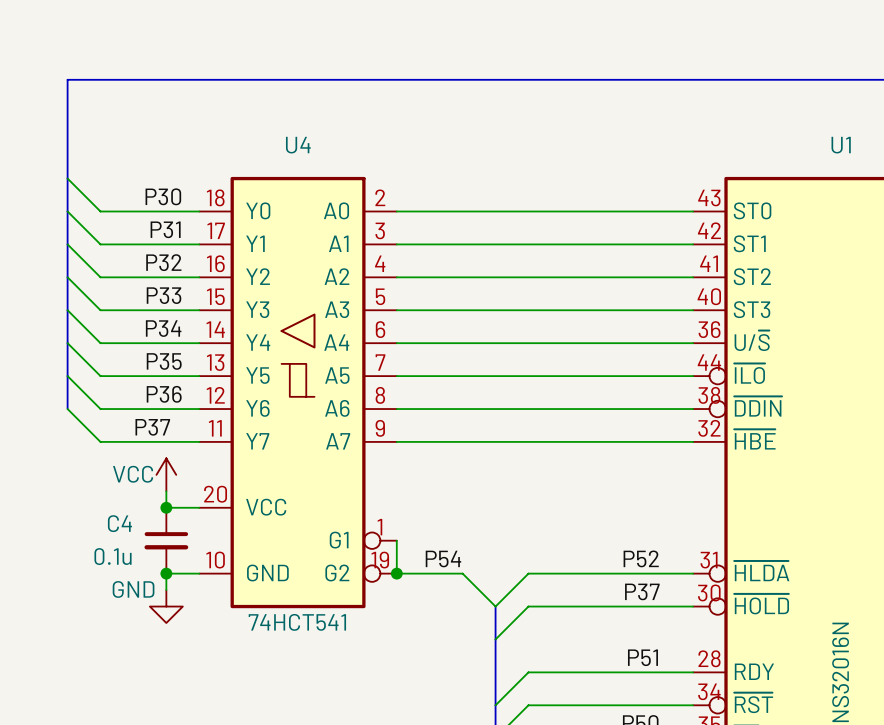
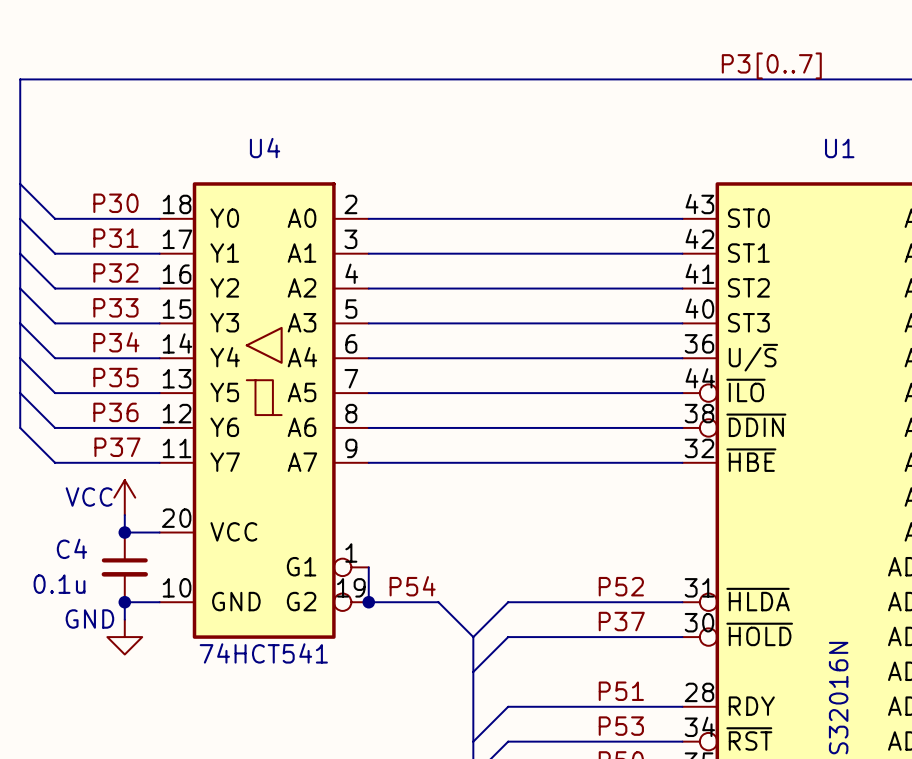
label: none -> P3[0..7] (771, 65)
label: none -> P53 (621, 726)

